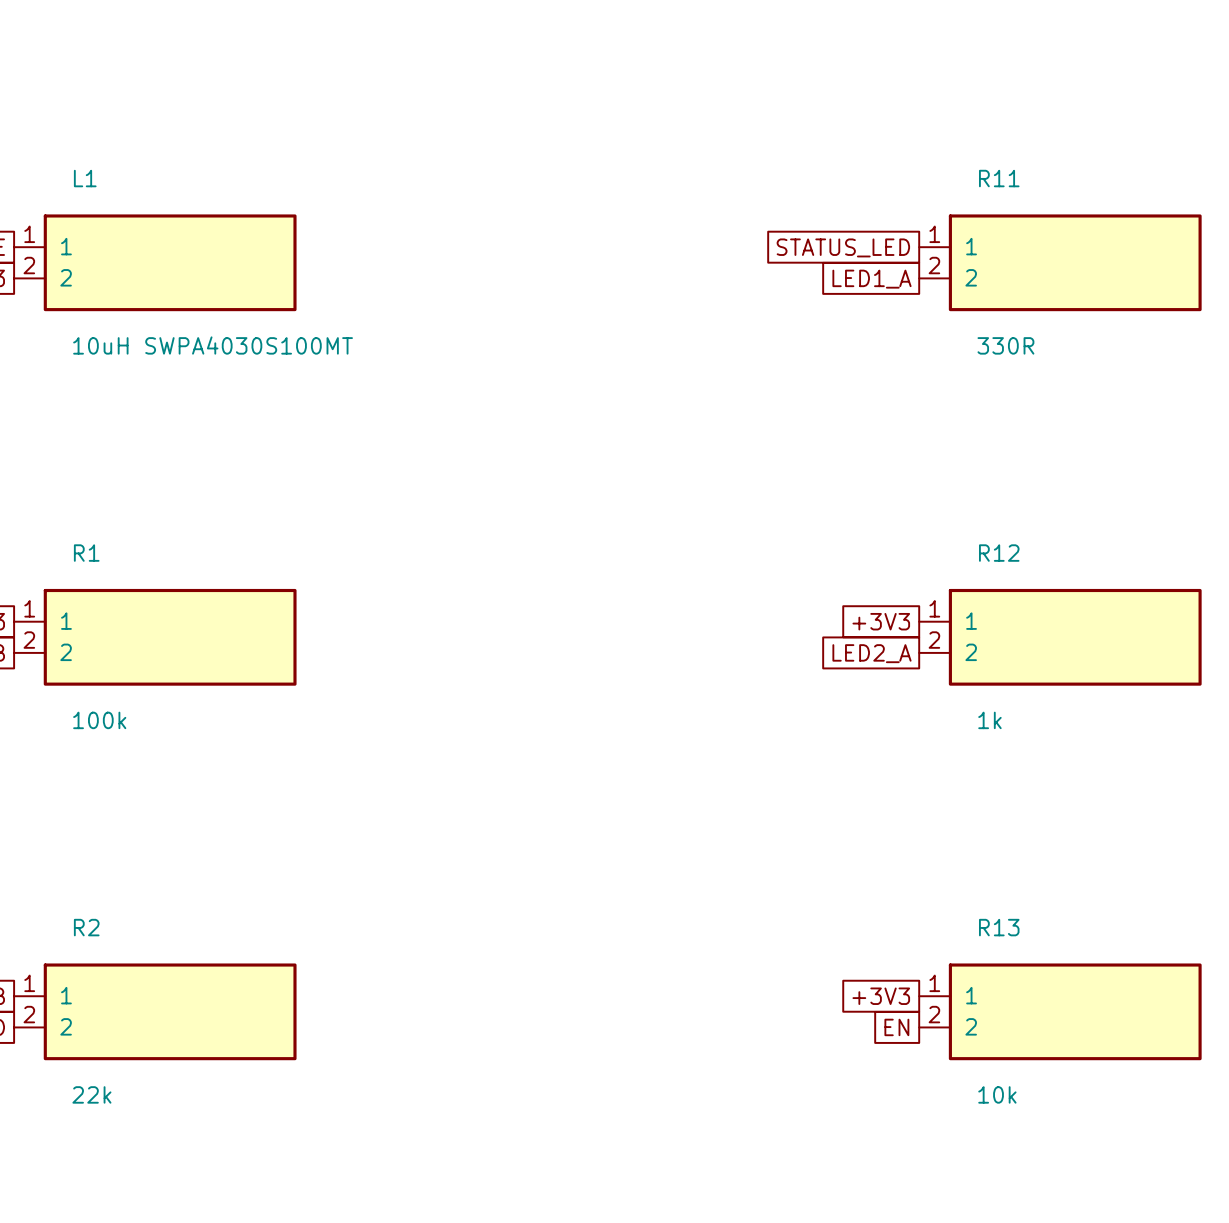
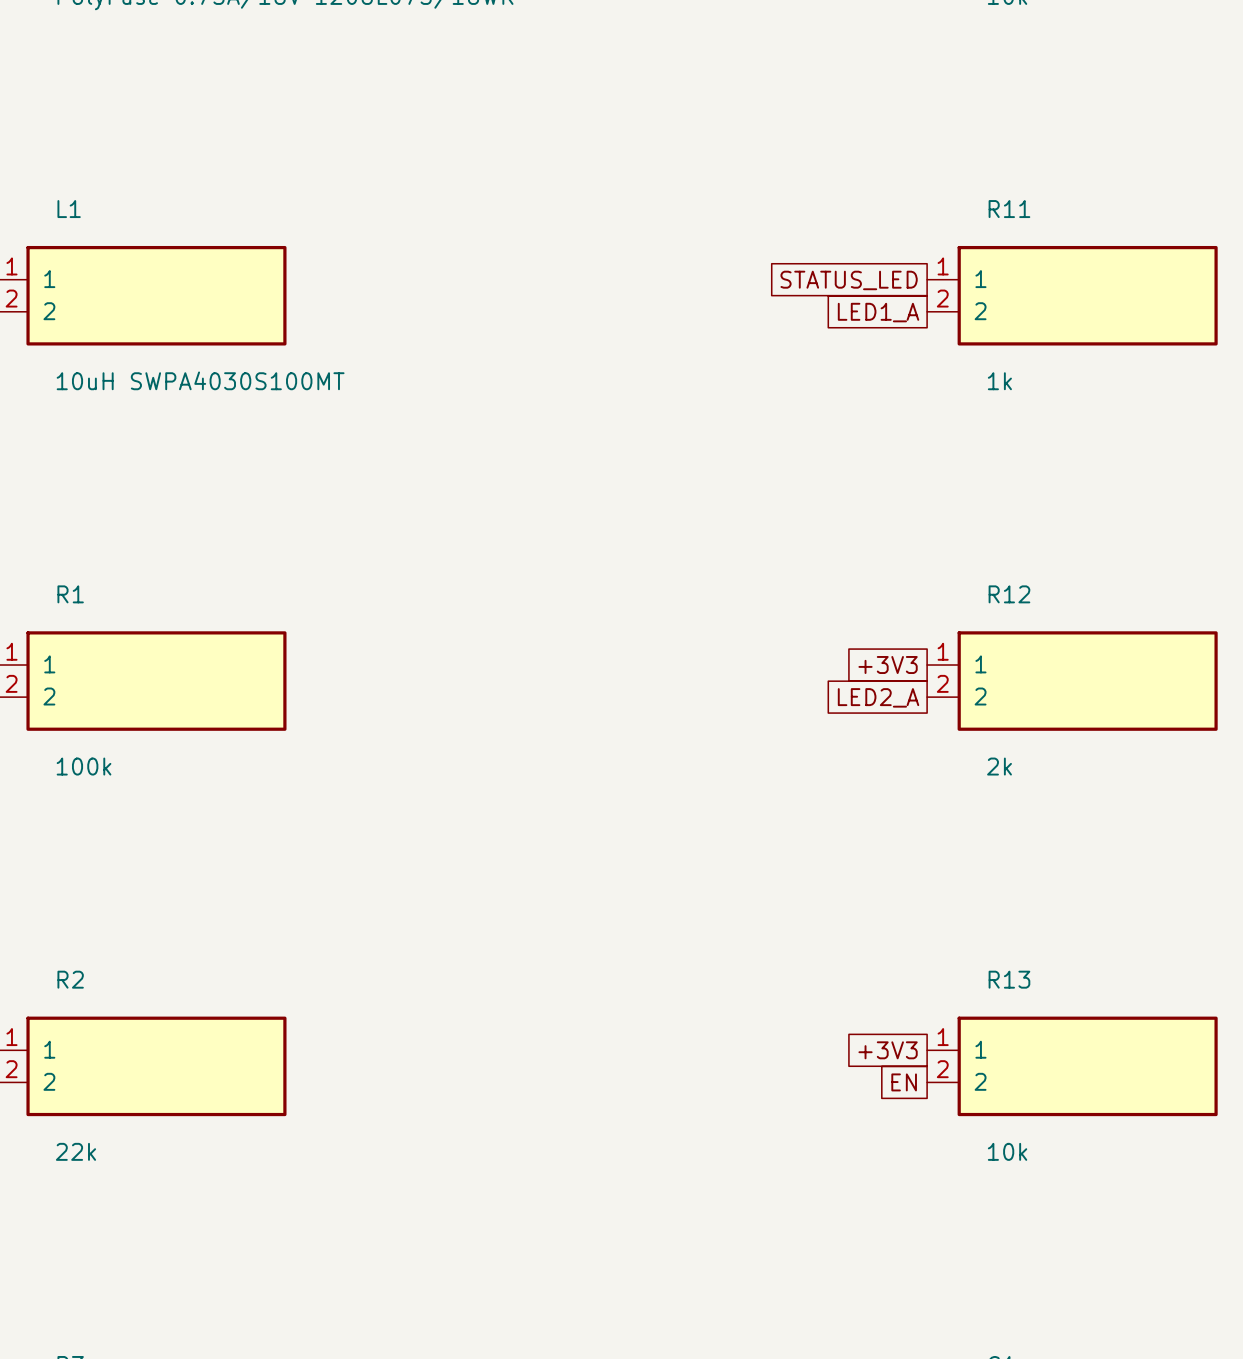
R11 value: 330R (1005, 345) -> 1k (999, 381)
R12 value: 1k (989, 720) -> 2k (999, 766)

